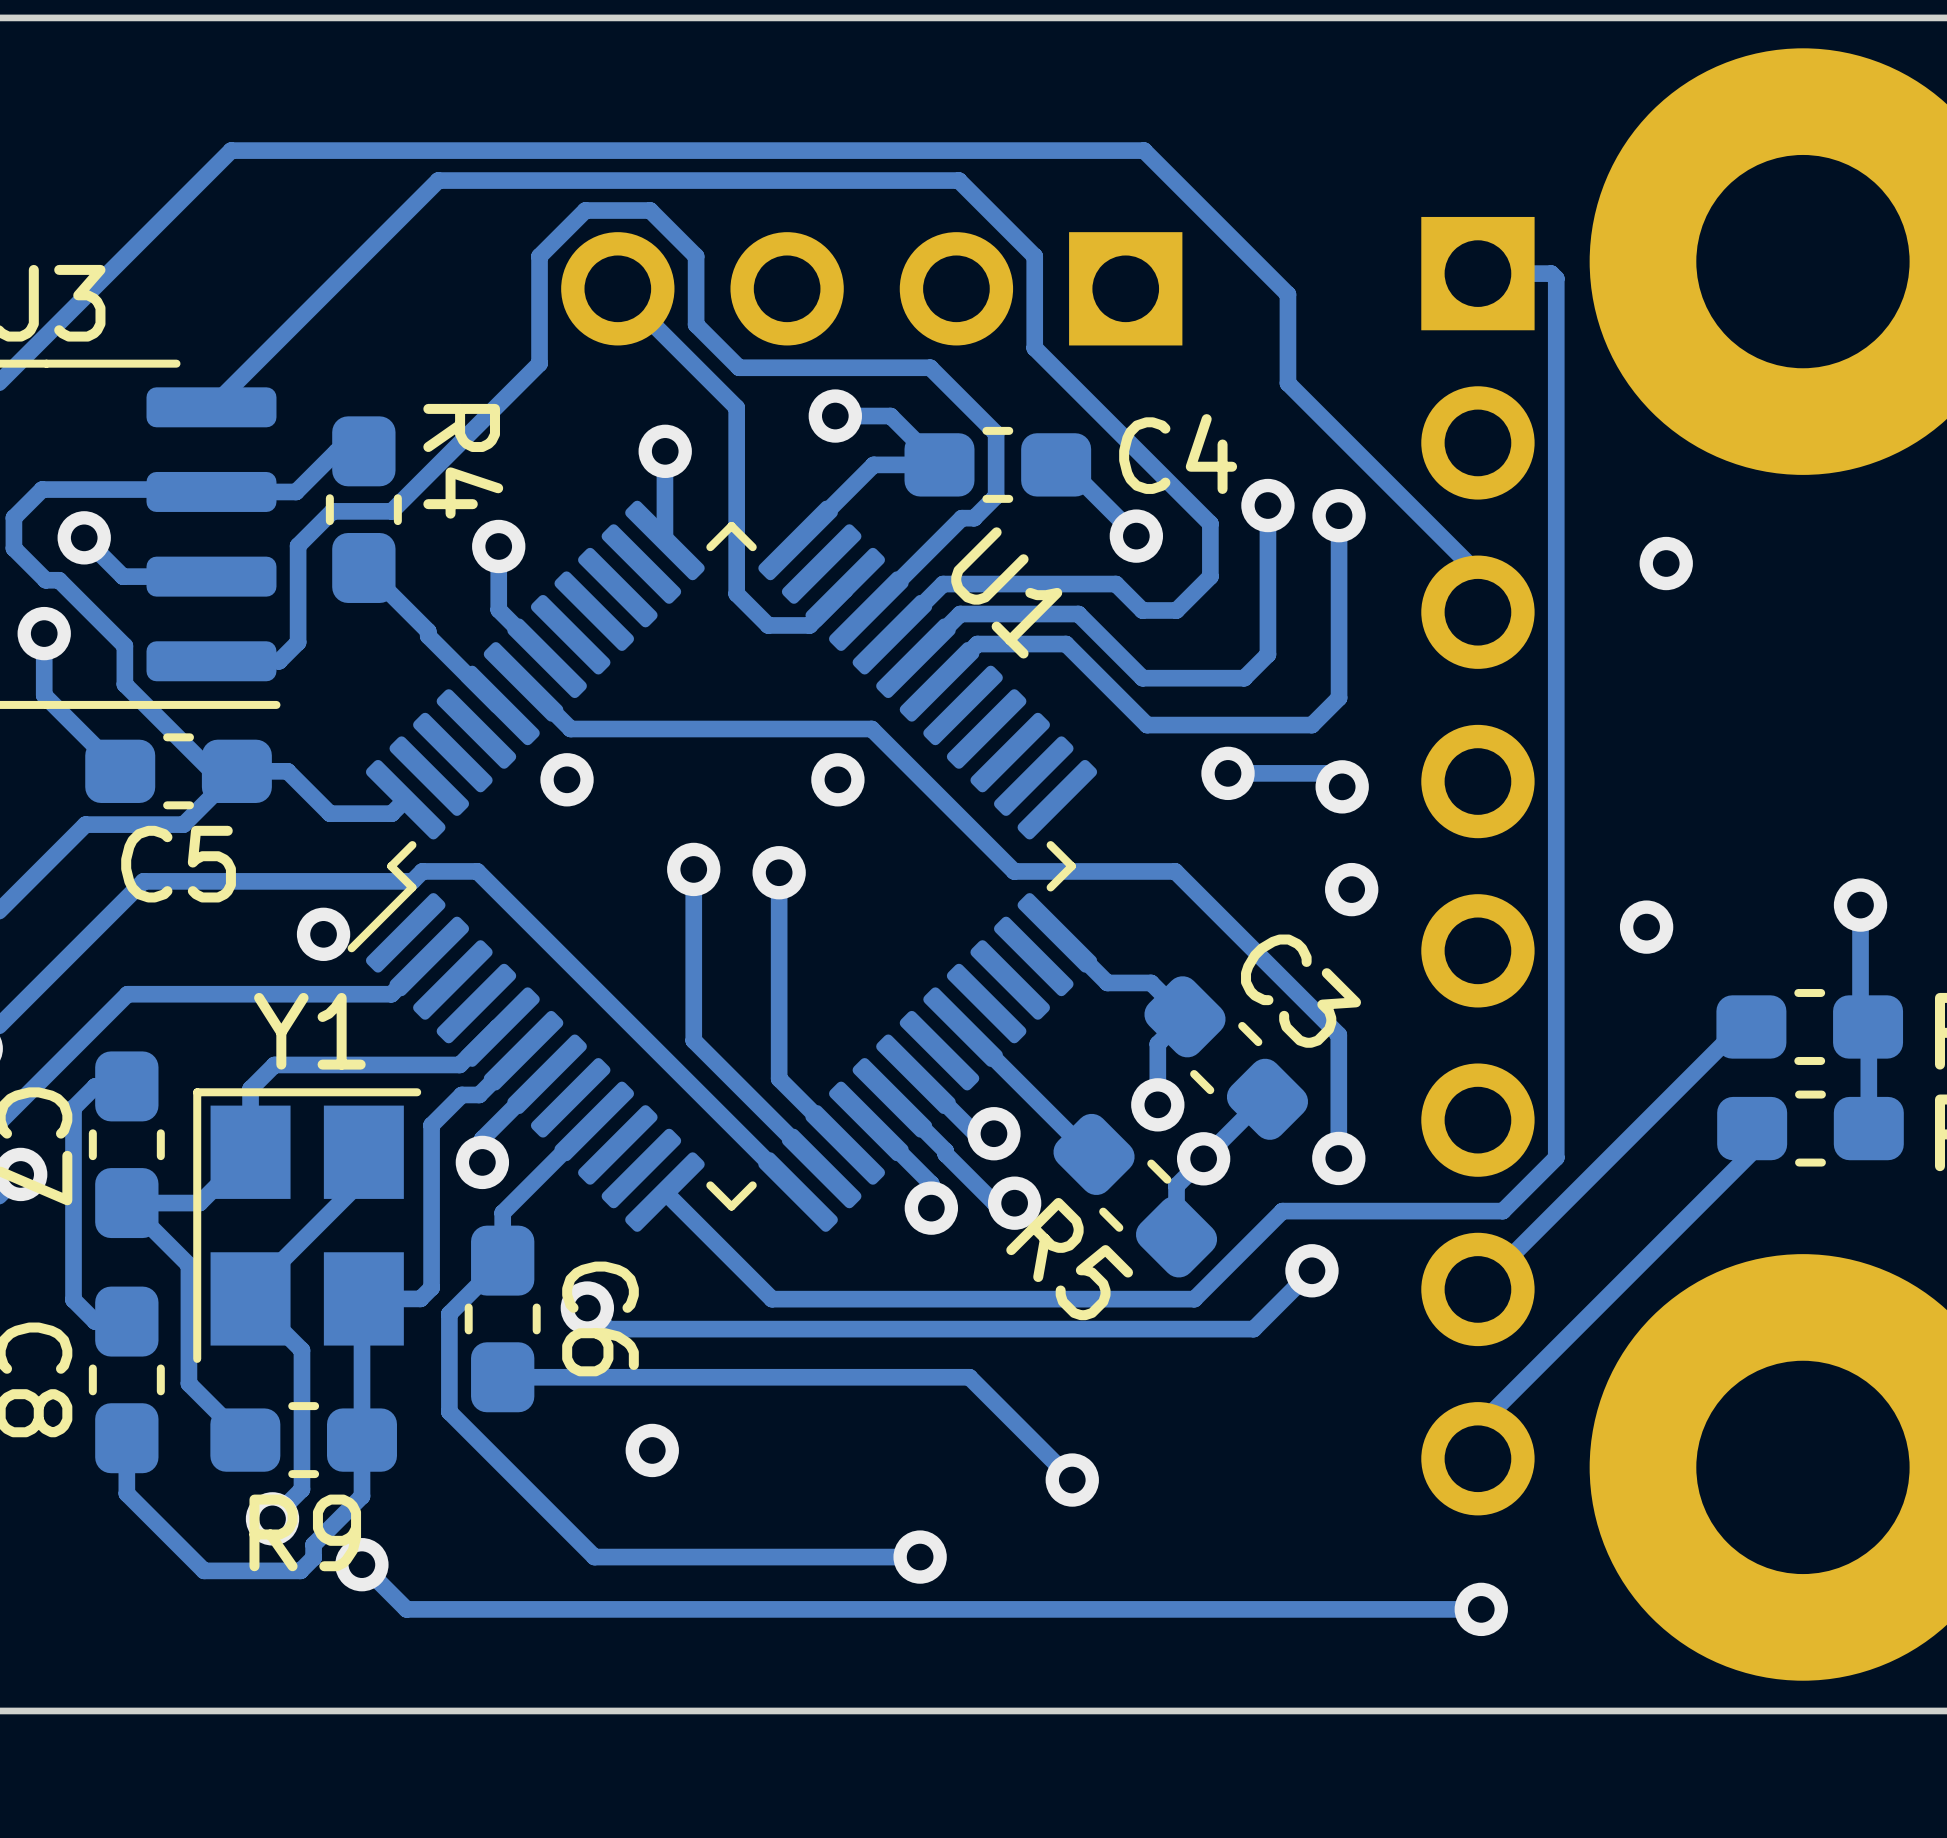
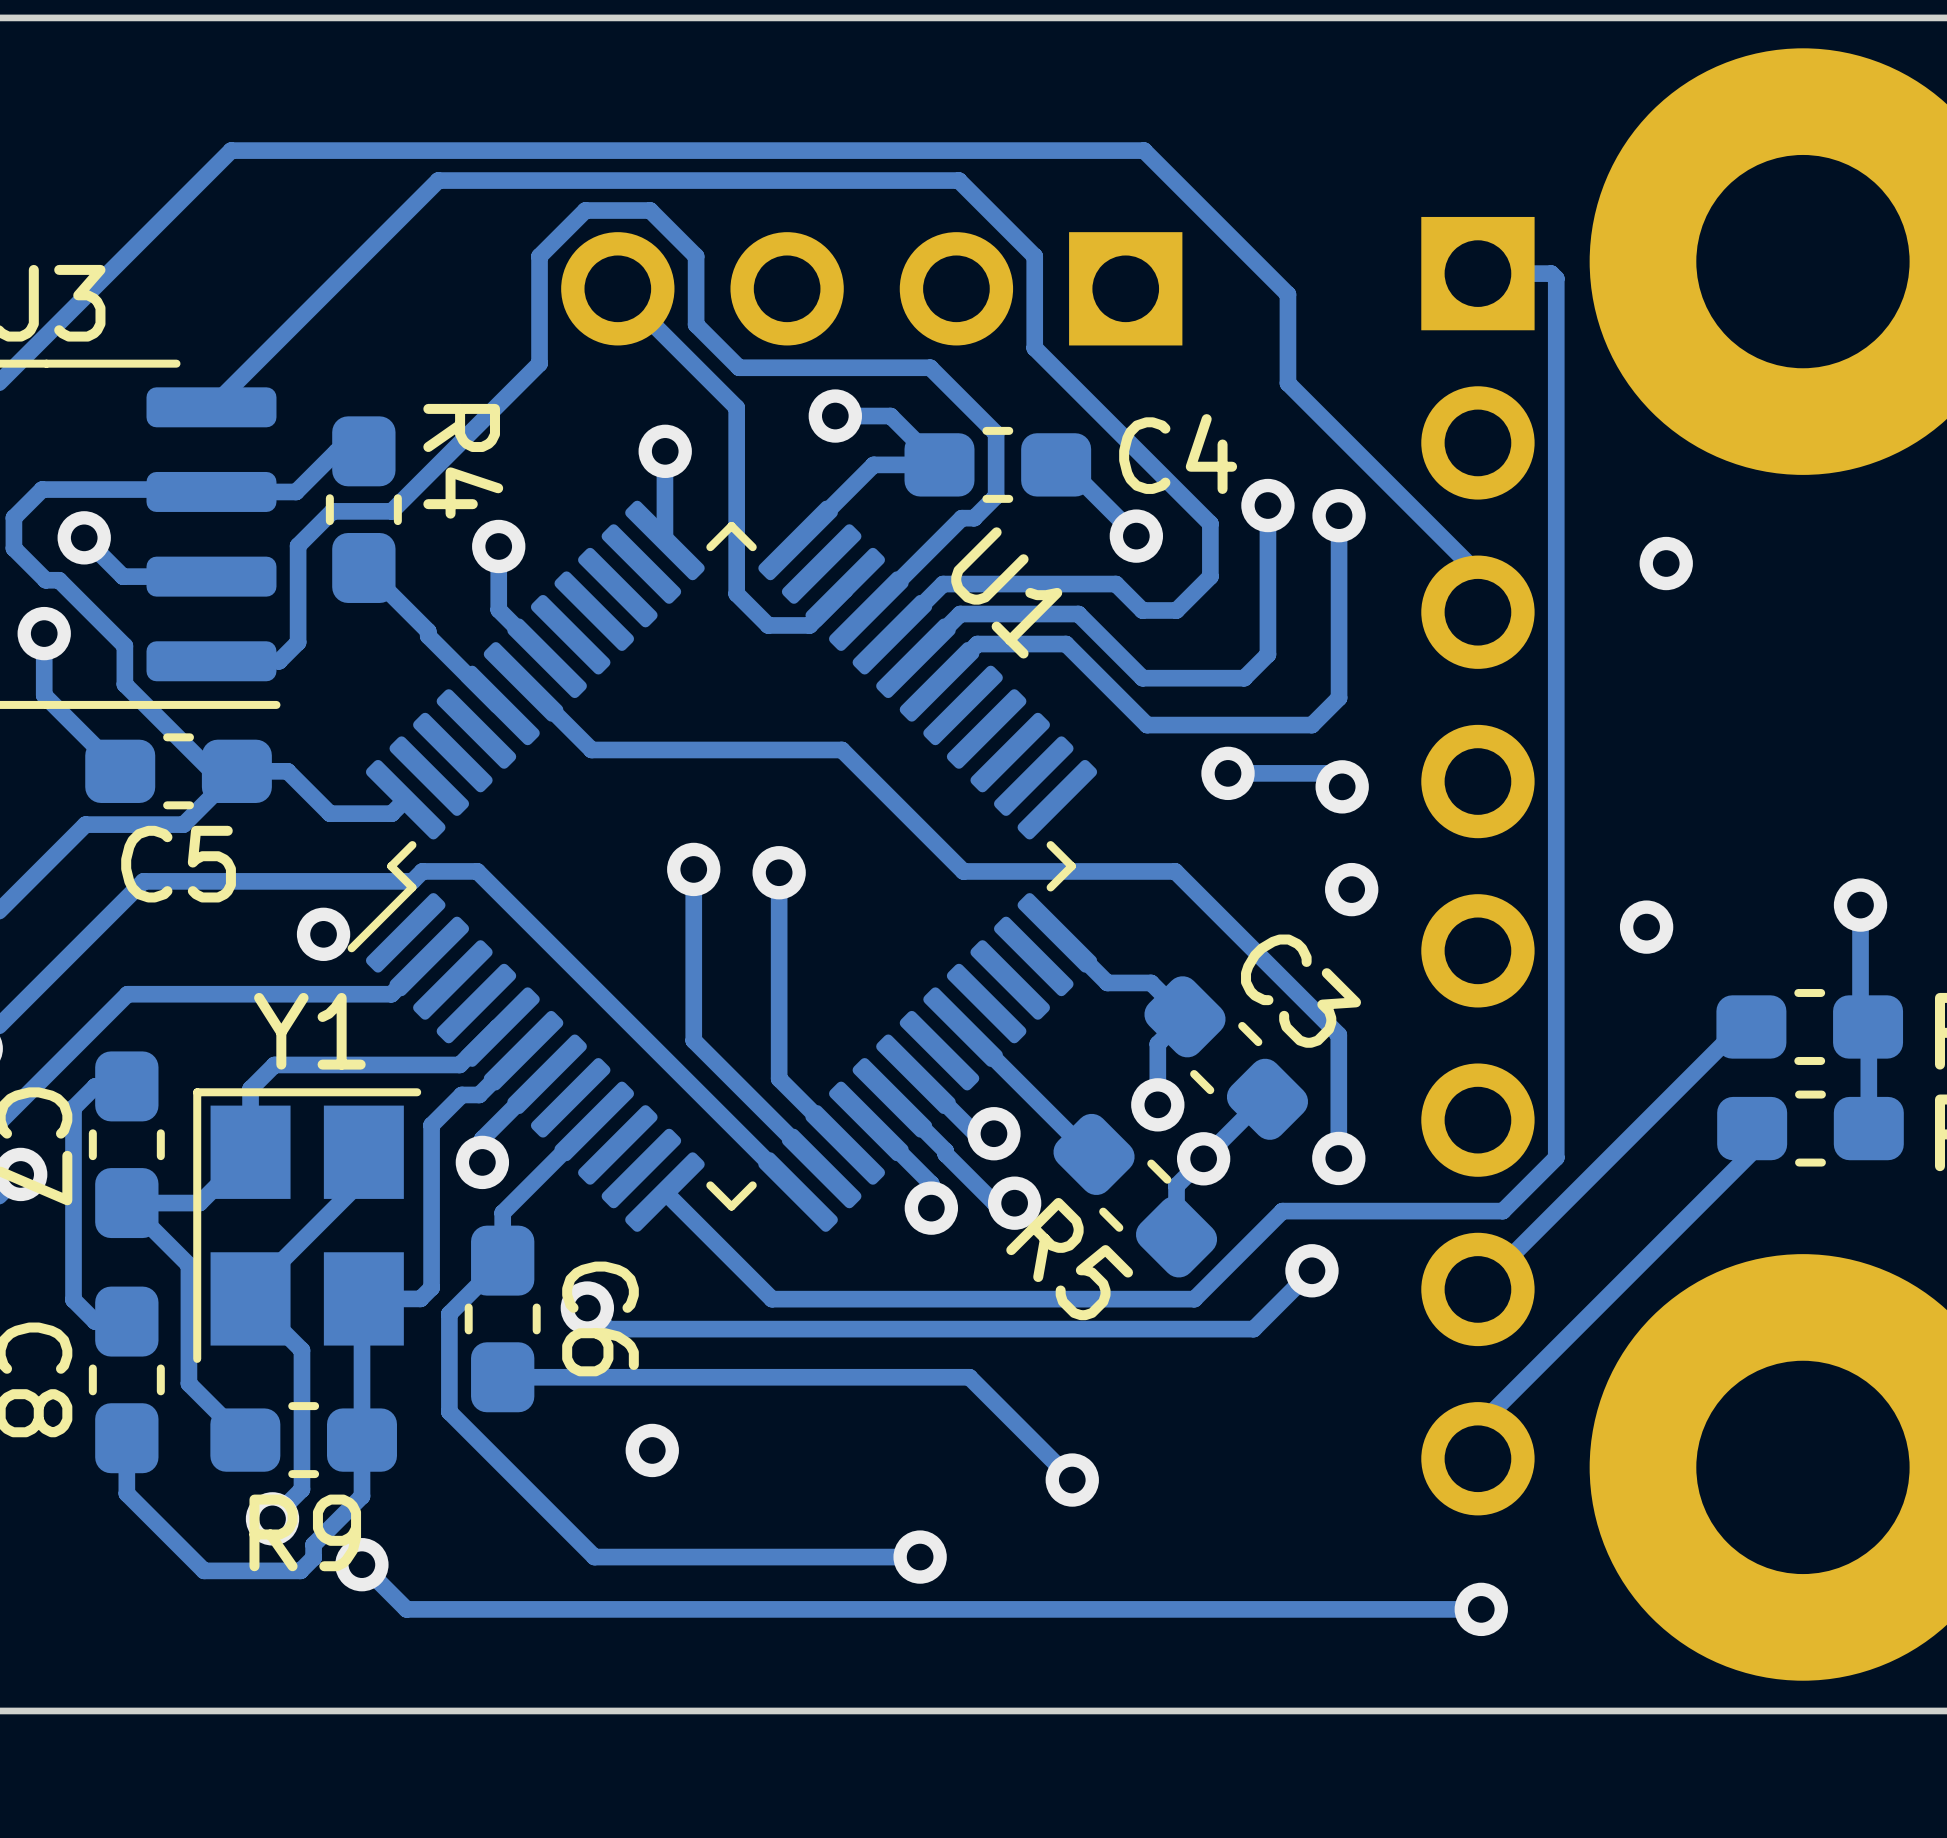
track: (570, 729) (871, 729) (1014, 871) -> (570, 729) (591, 749) (841, 749) (963, 871) (1014, 871)
via: (567, 779) -> none
via: (837, 779) -> none

